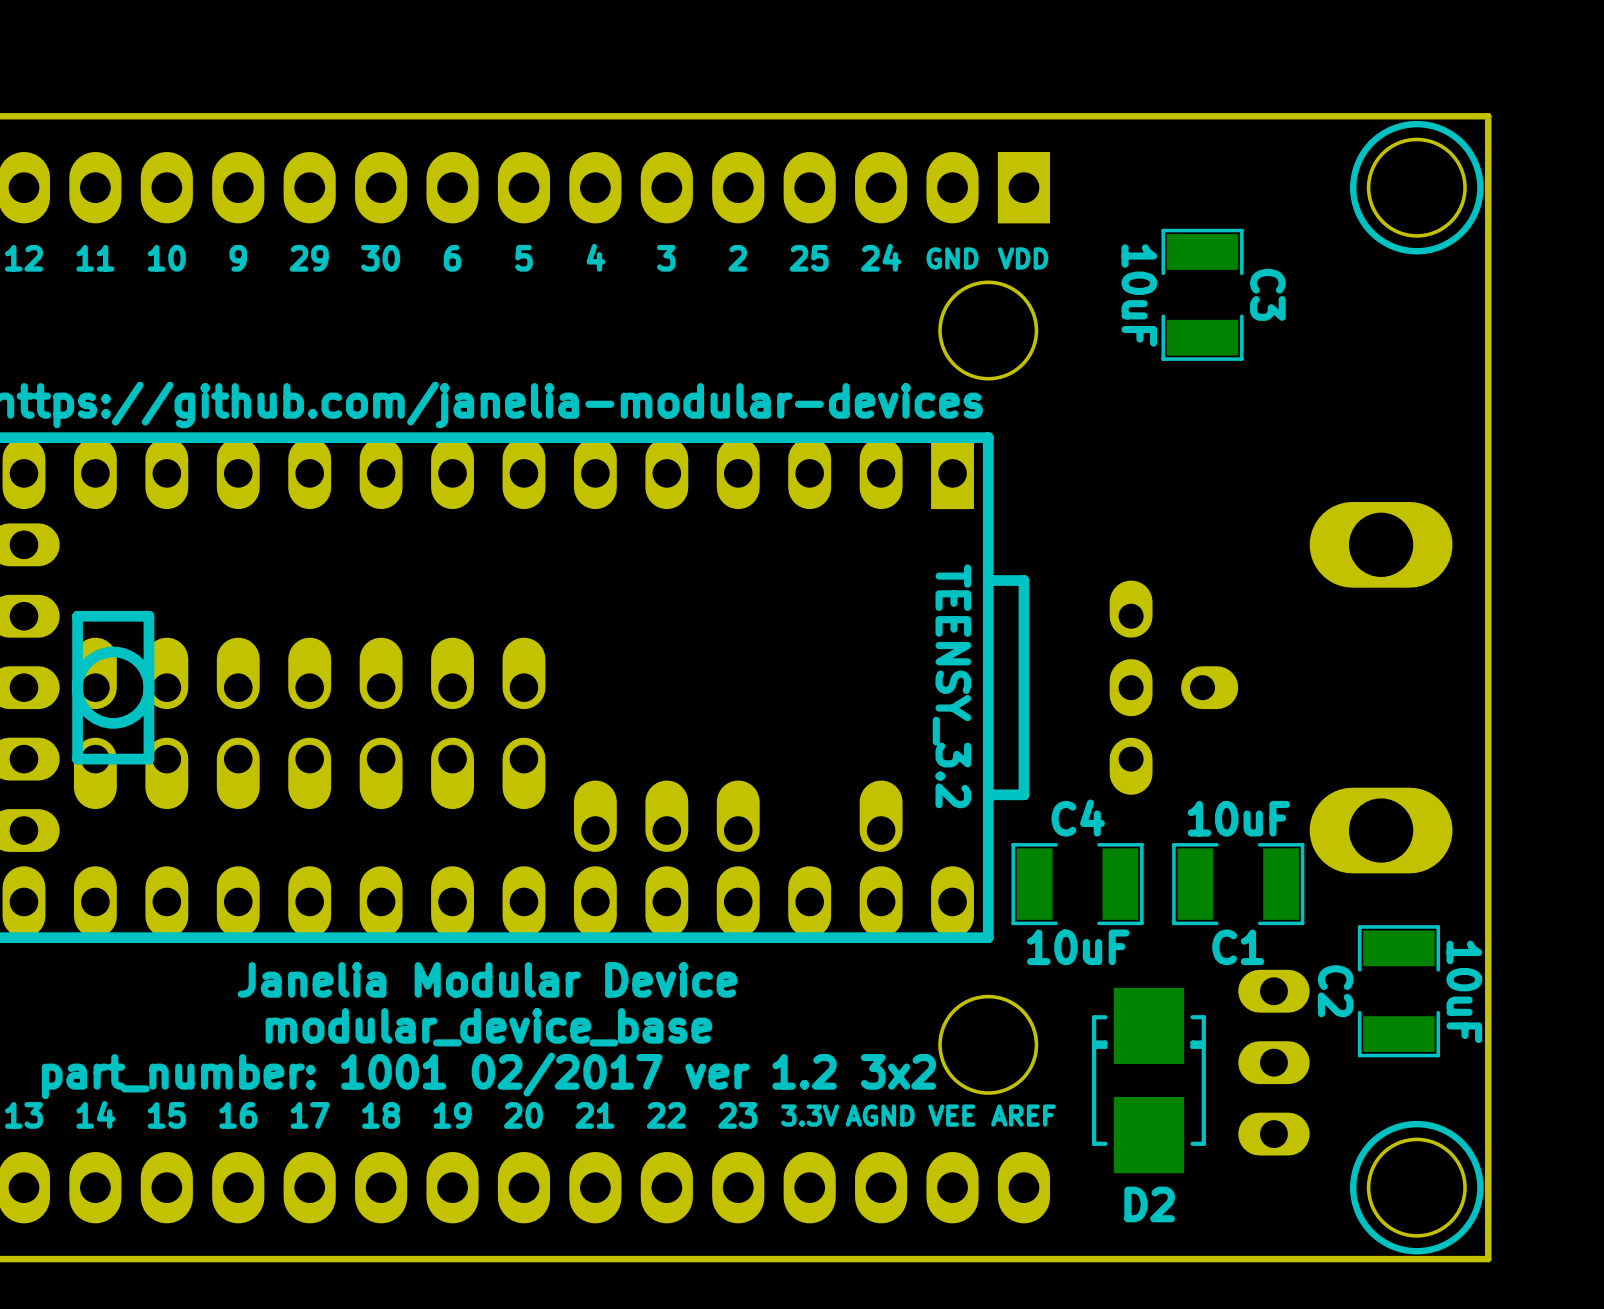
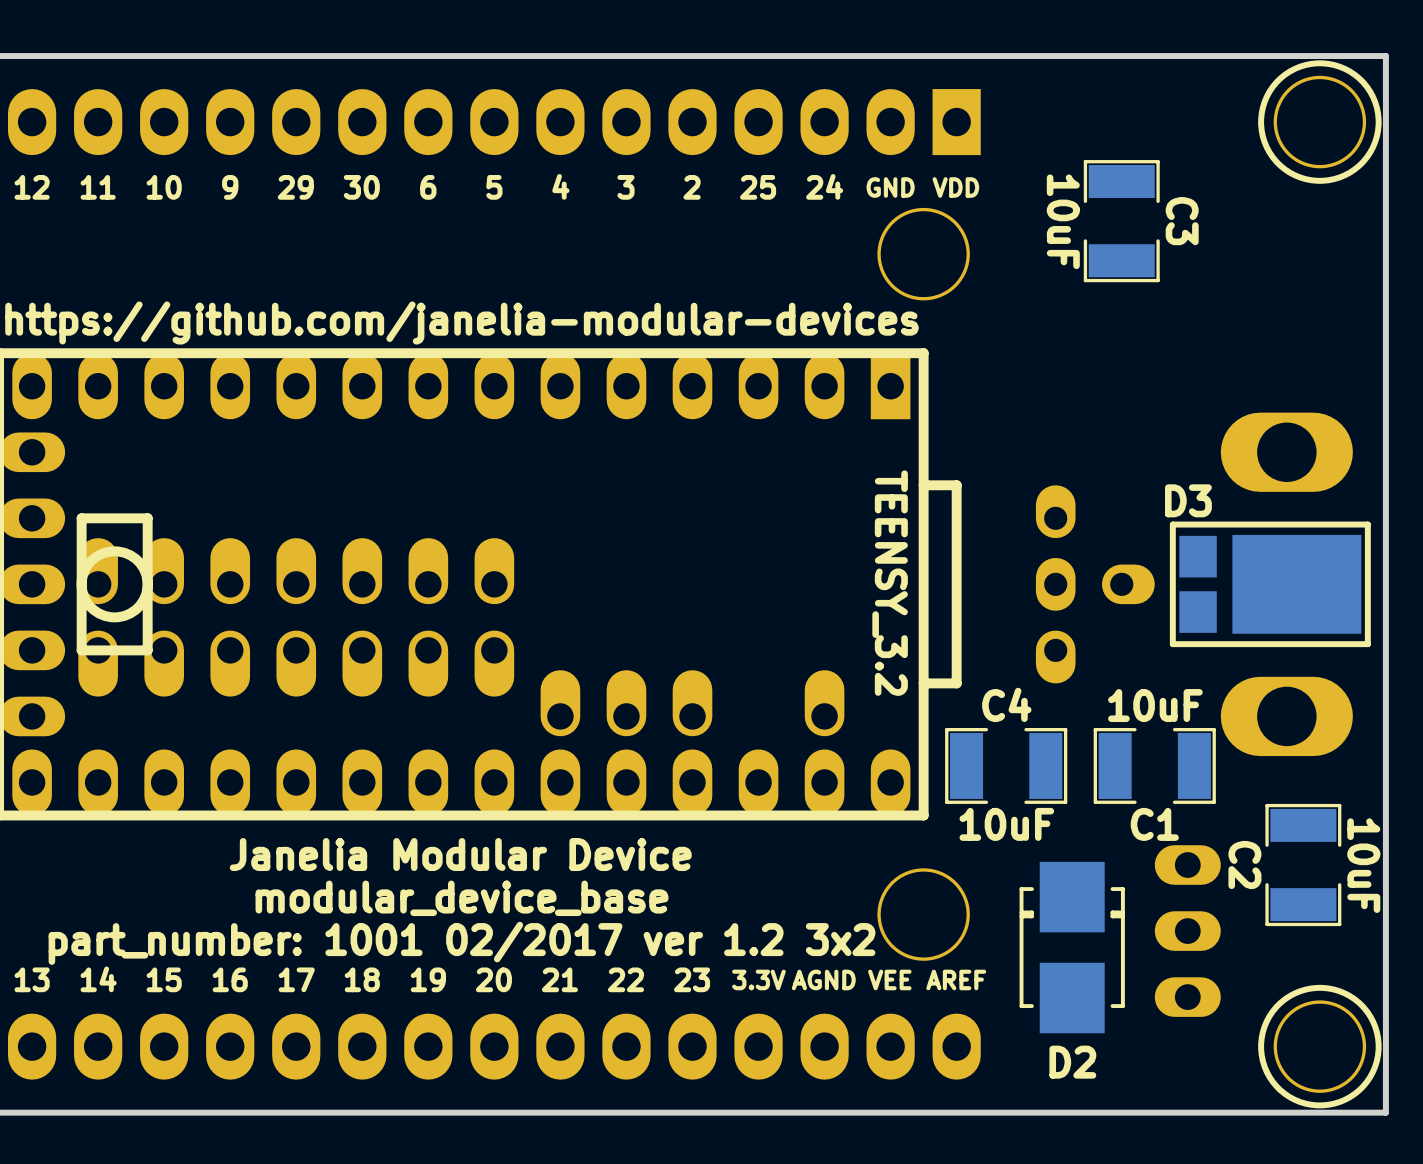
D3: none -> (1270, 584)

